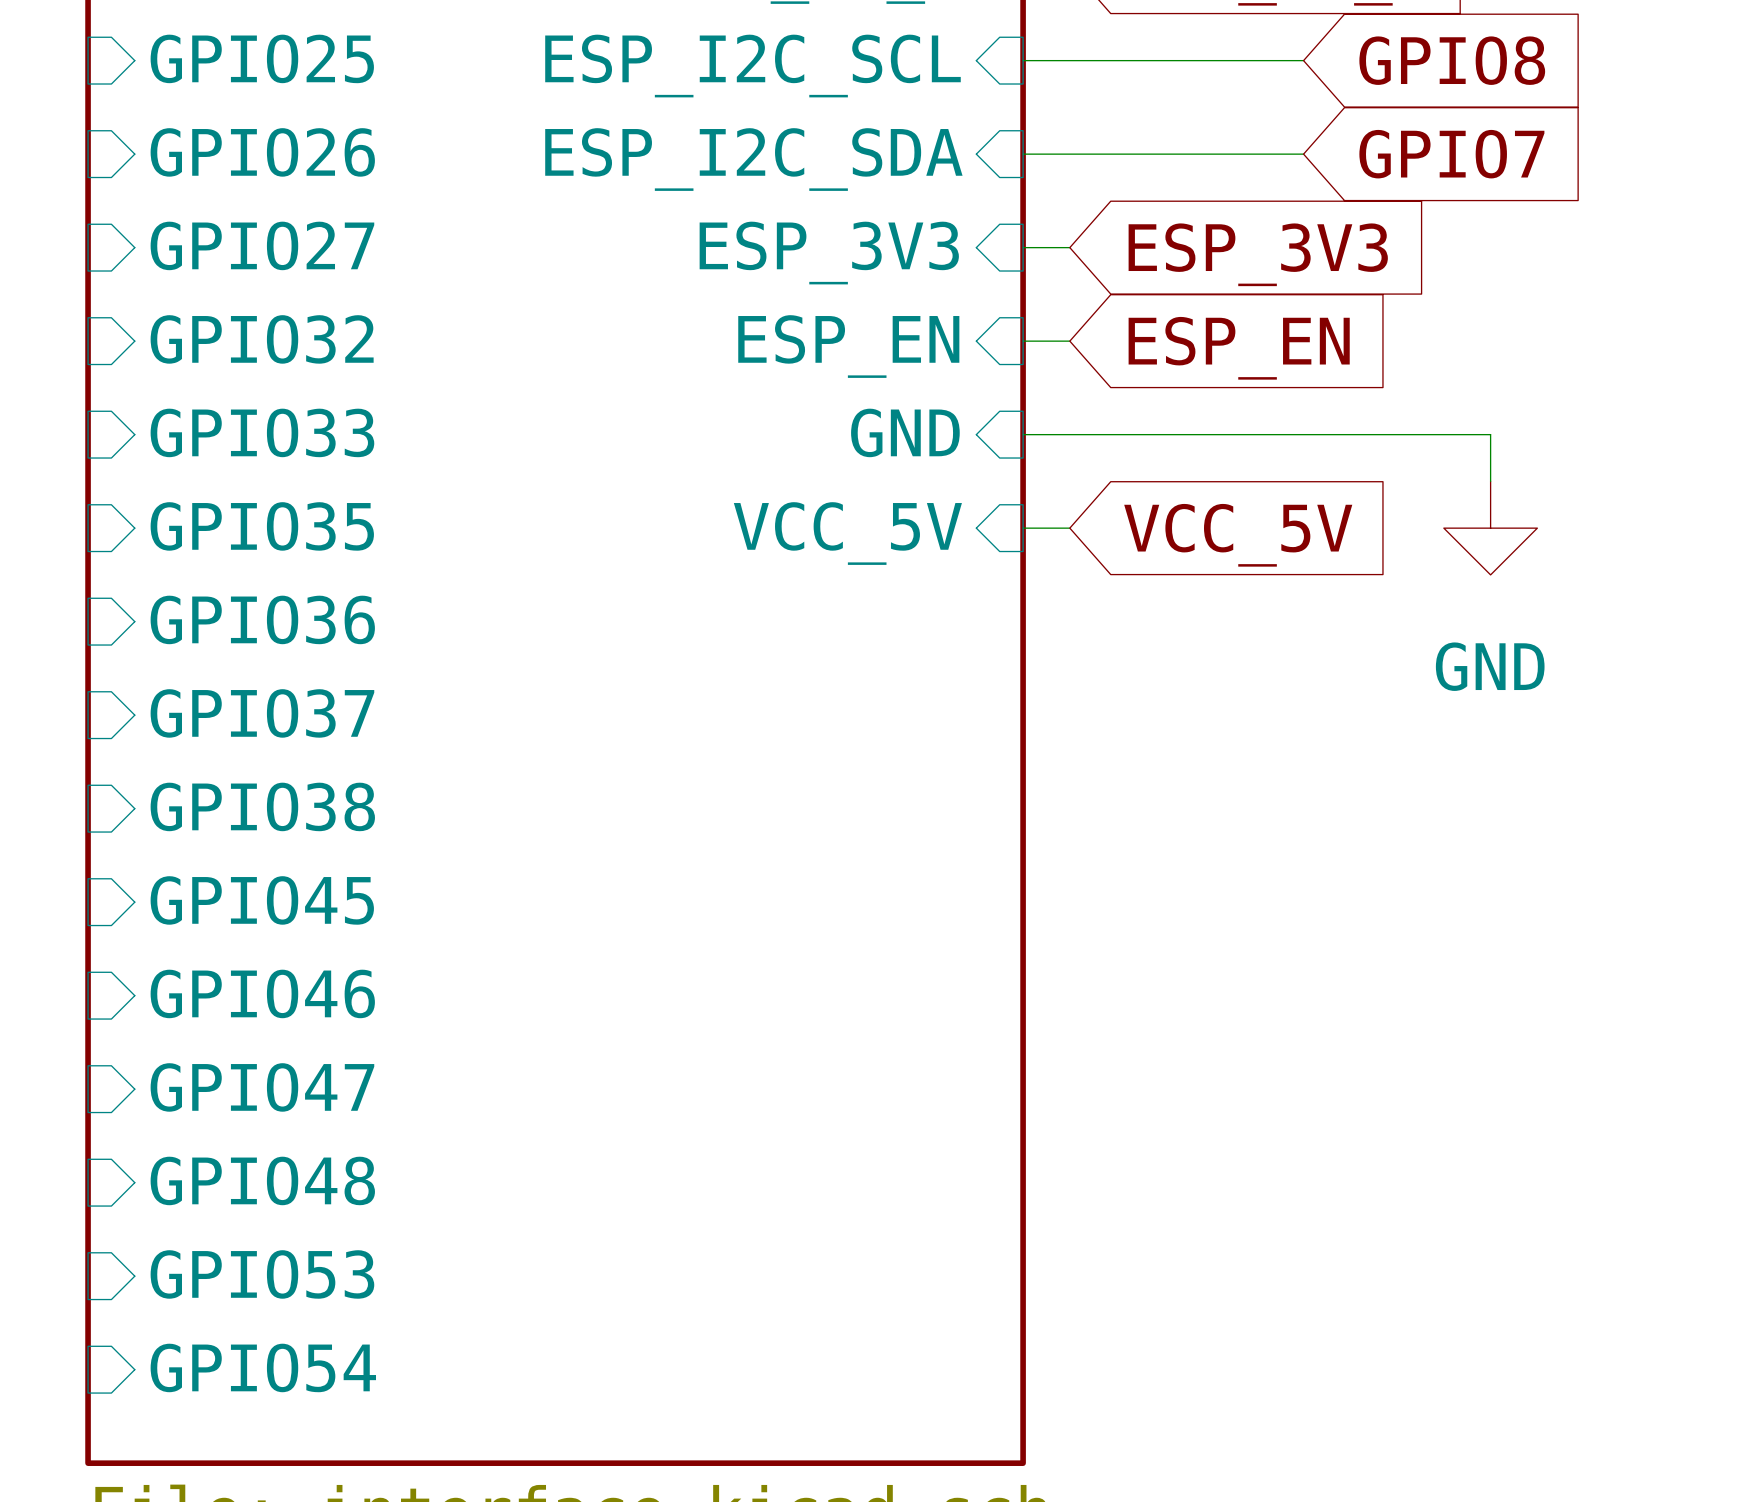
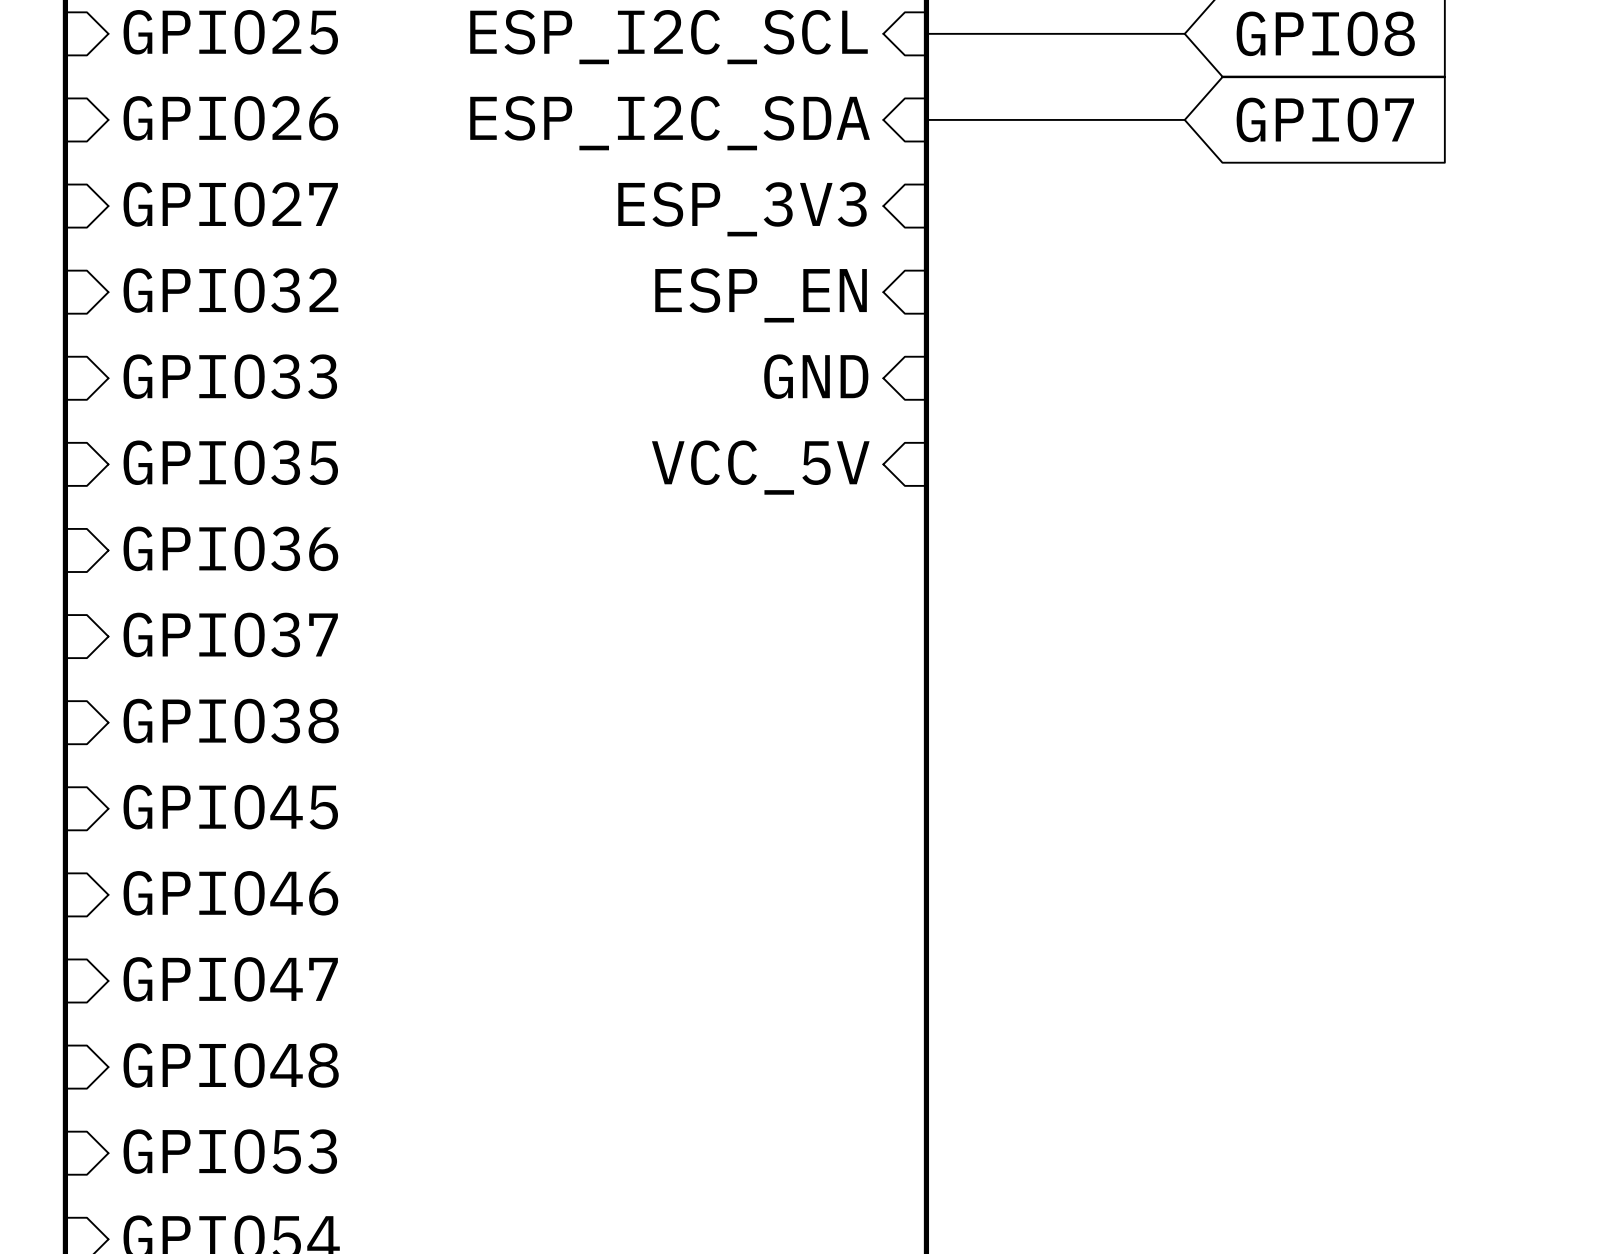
wire: (1023, 247) (1069, 247) -> none
global label: ESP_3V3 (1258, 254) -> none
wire: (1023, 341) (1069, 341) -> none
global label: ESP_EN (1239, 348) -> none
wire: (1023, 434) (1490, 434) (1490, 481) -> none
wire: (1023, 528) (1069, 528) -> none
power symbol: GND (1490, 528) -> none
global label: VCC_5V (1238, 535) -> none

